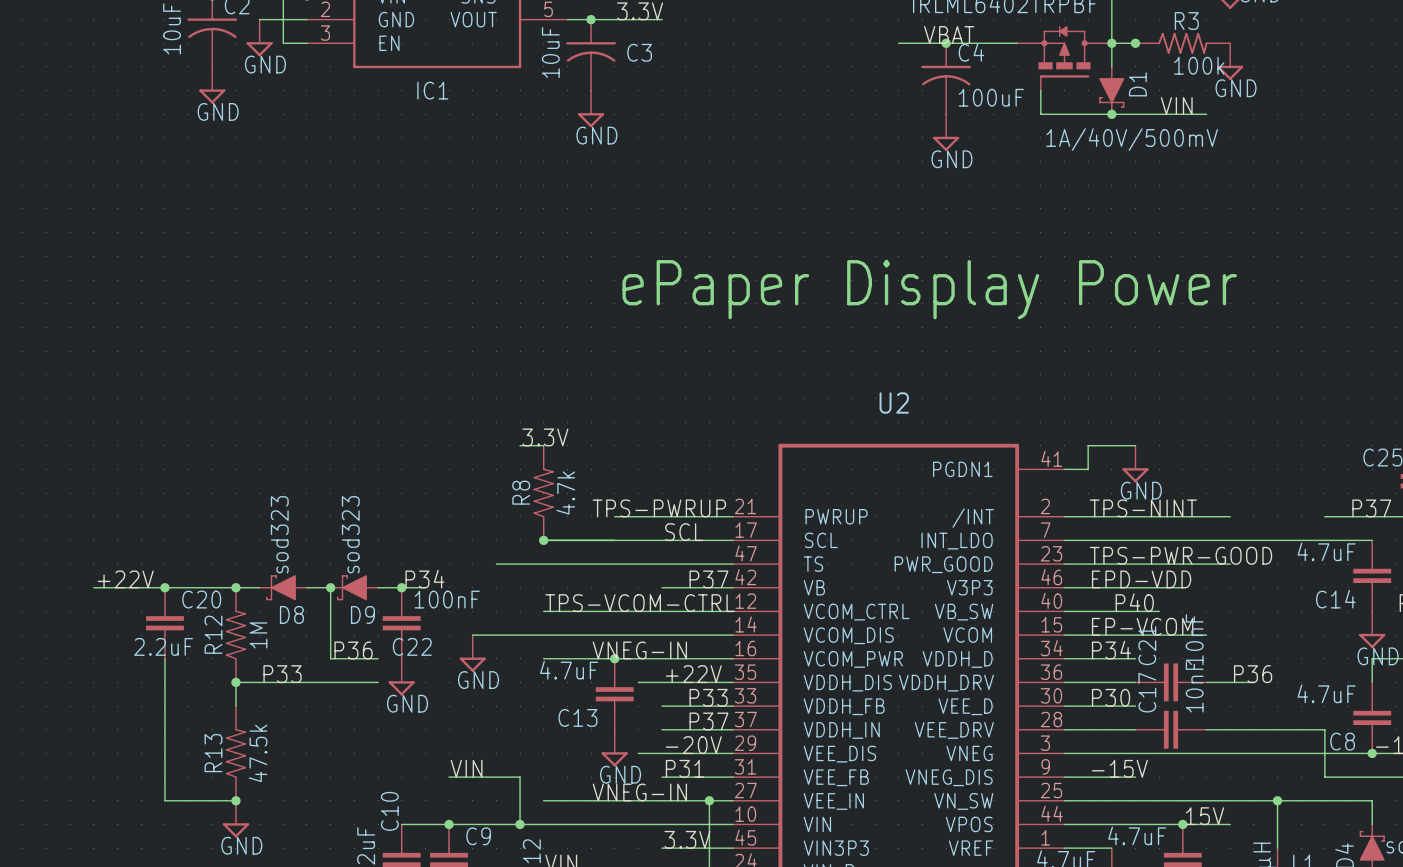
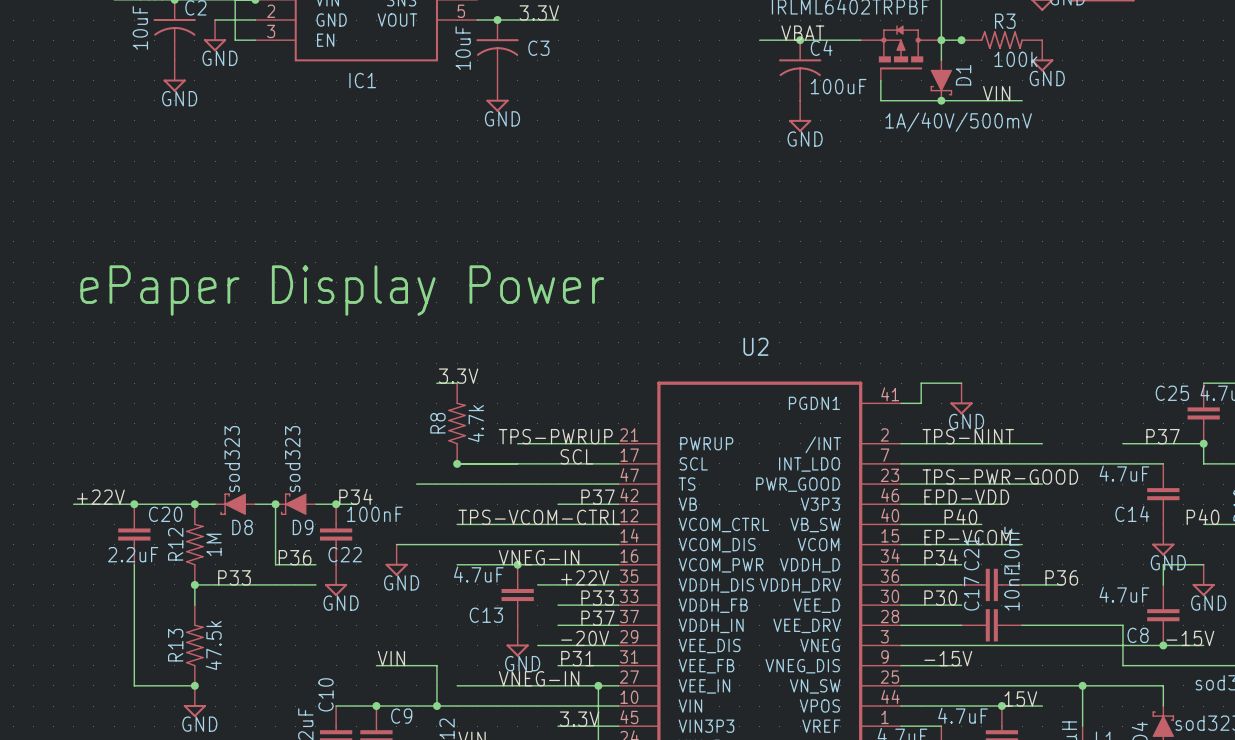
text: ePaper Display Power (929, 289) -> none
text: none -> ePaper Display Power (342, 290)

